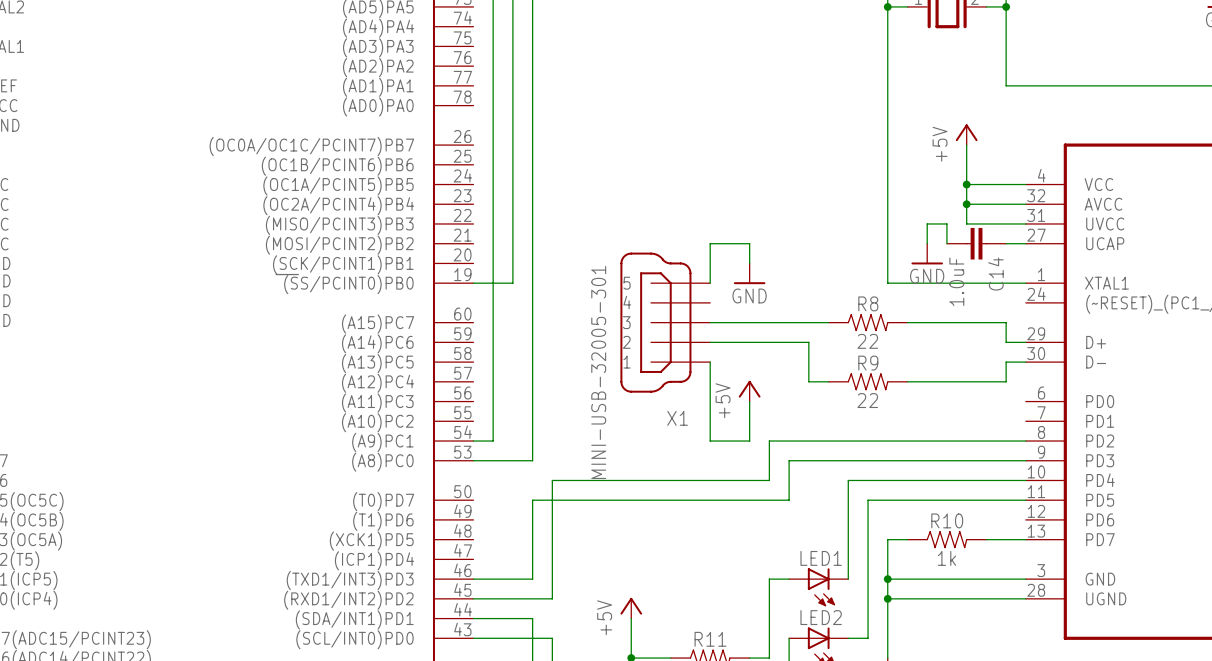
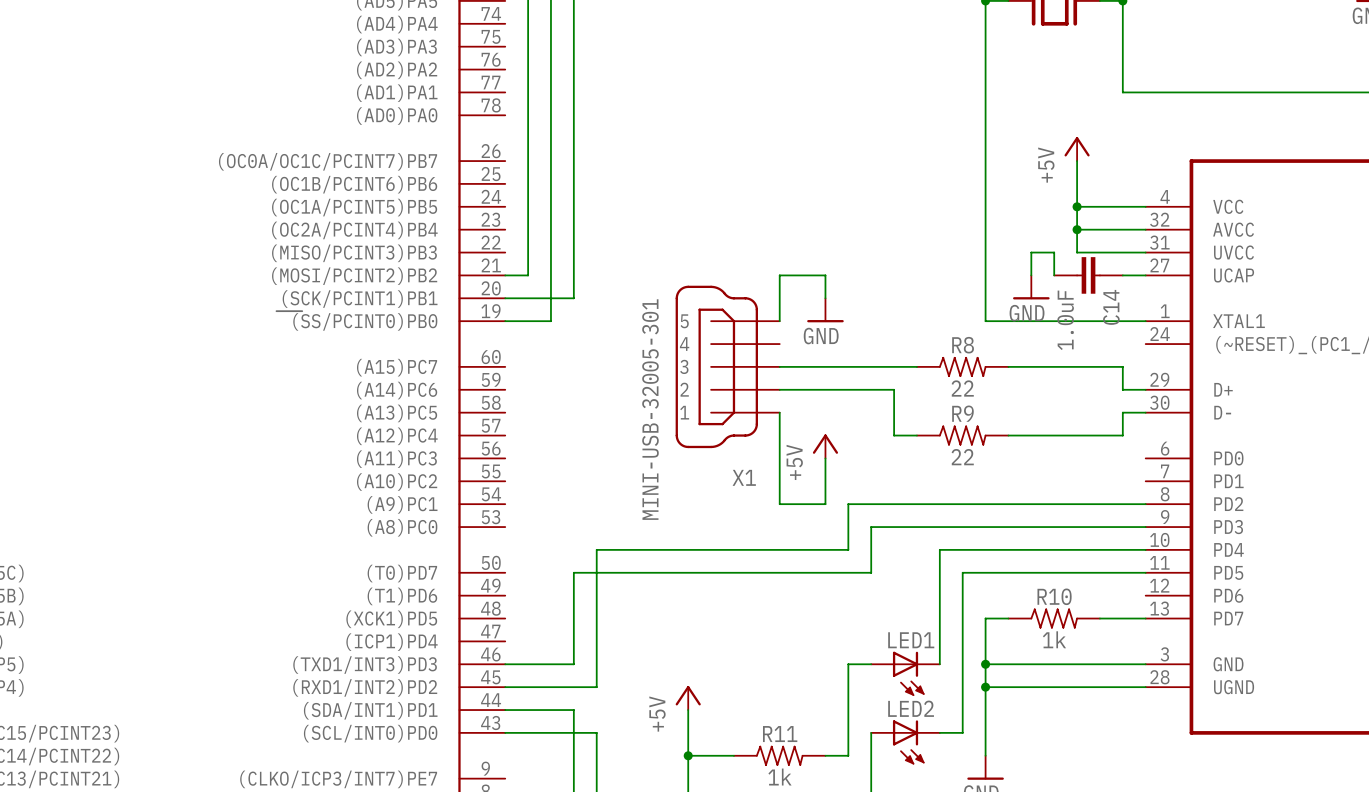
wire: (493, 243) (493, 441) (473, 441) -> (528, 275) (505, 275)
wire: (532, 263) (532, 460) (473, 460) -> (573, 298) (505, 298)

